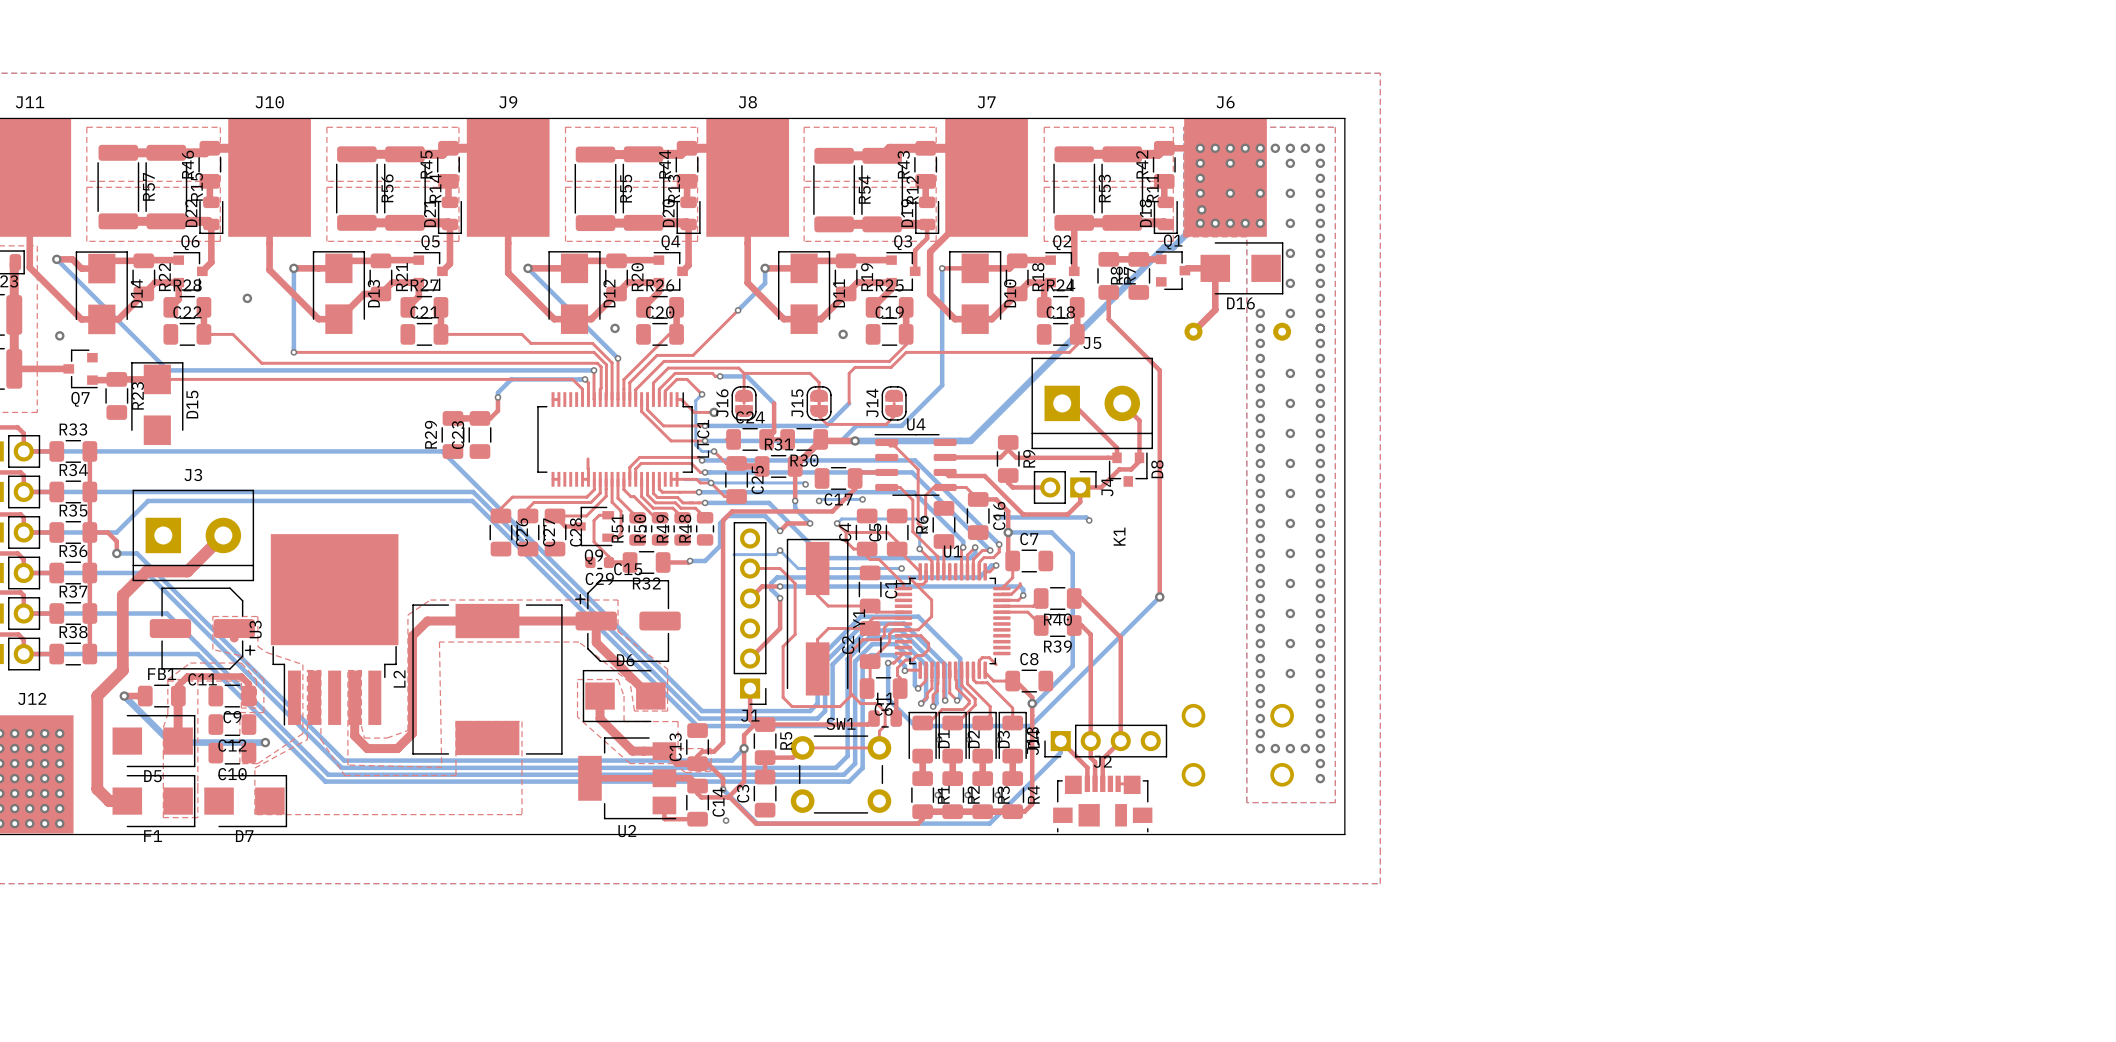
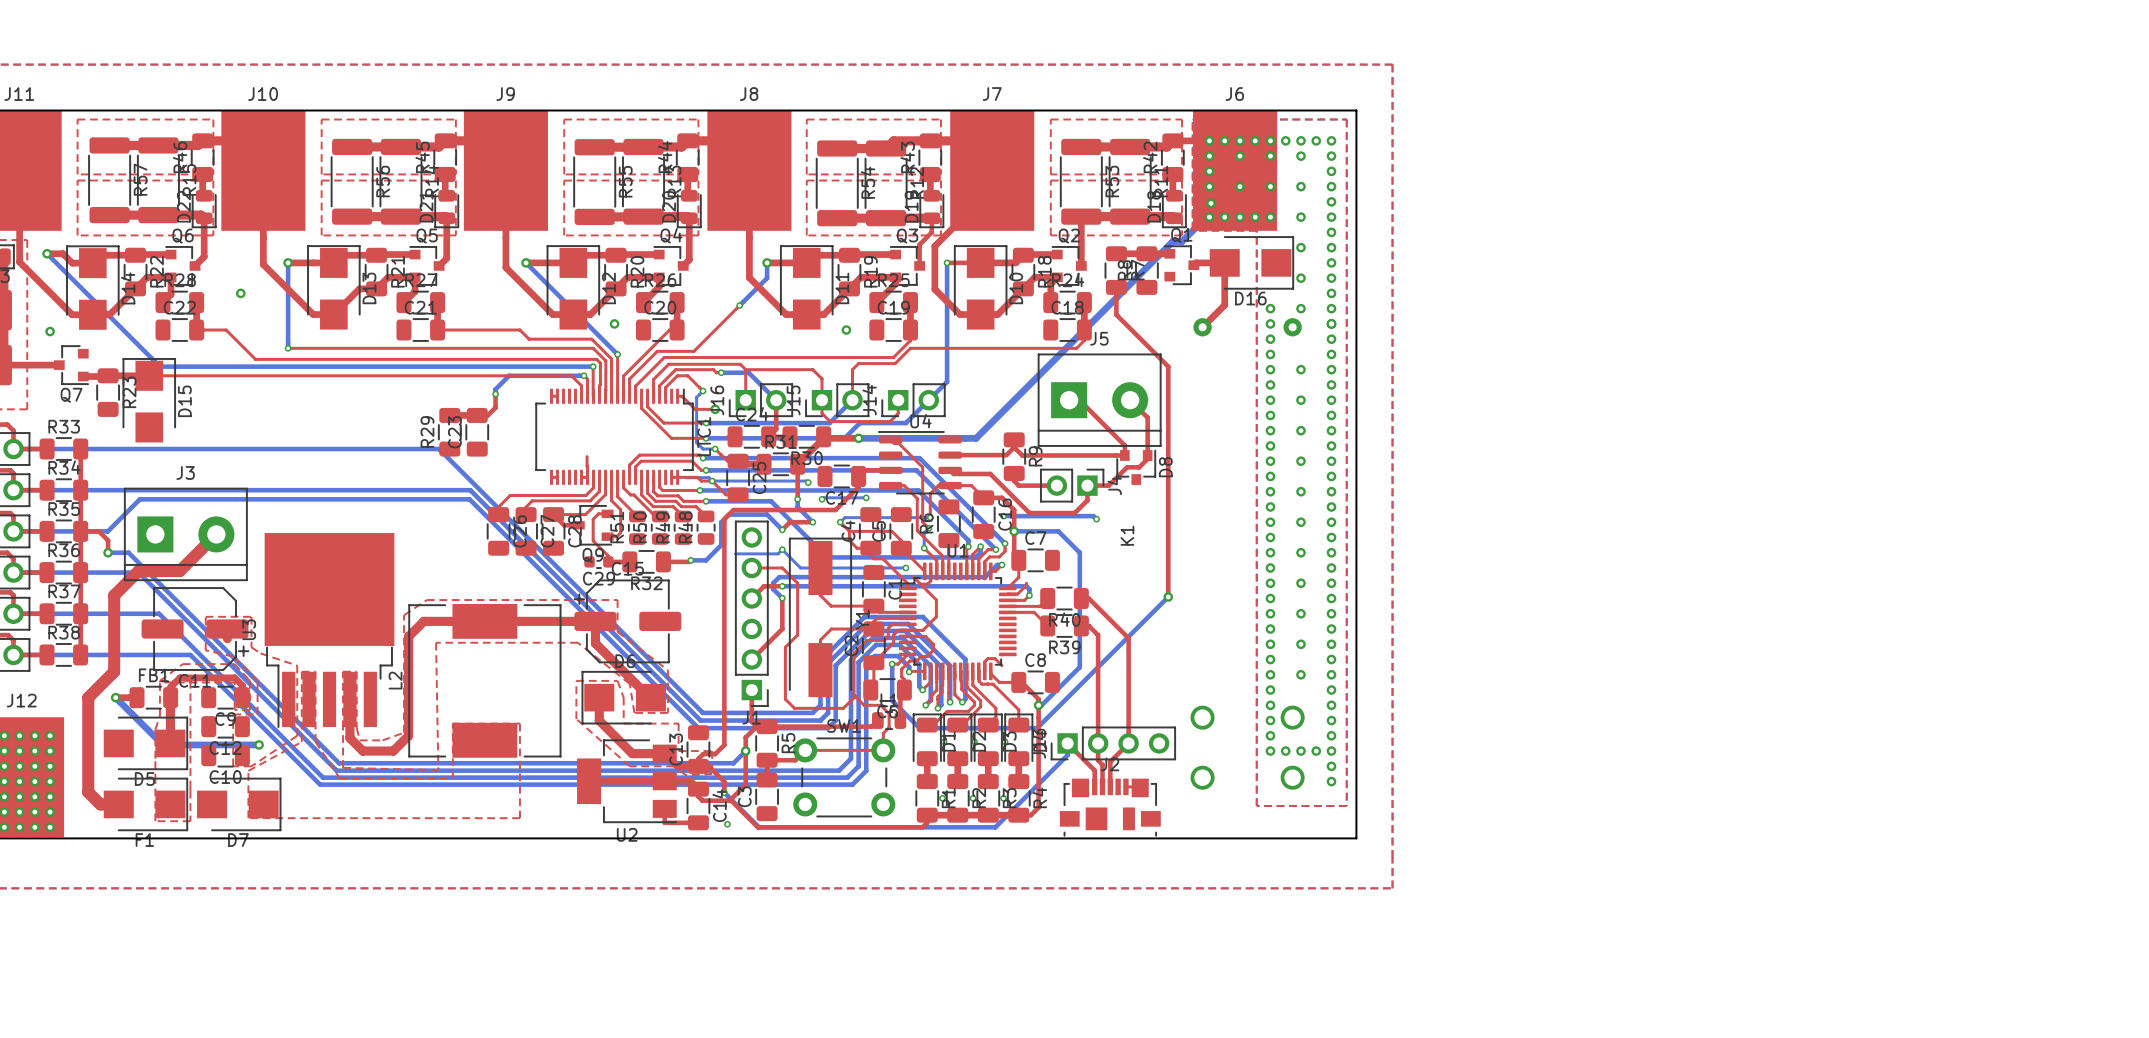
J16 footprint: [731, 386, 757, 421] -> [729, 383, 793, 417]
J15 footprint: [806, 386, 832, 421] -> [805, 383, 870, 417]
J14 footprint: [881, 386, 907, 421] -> [881, 383, 946, 417]

